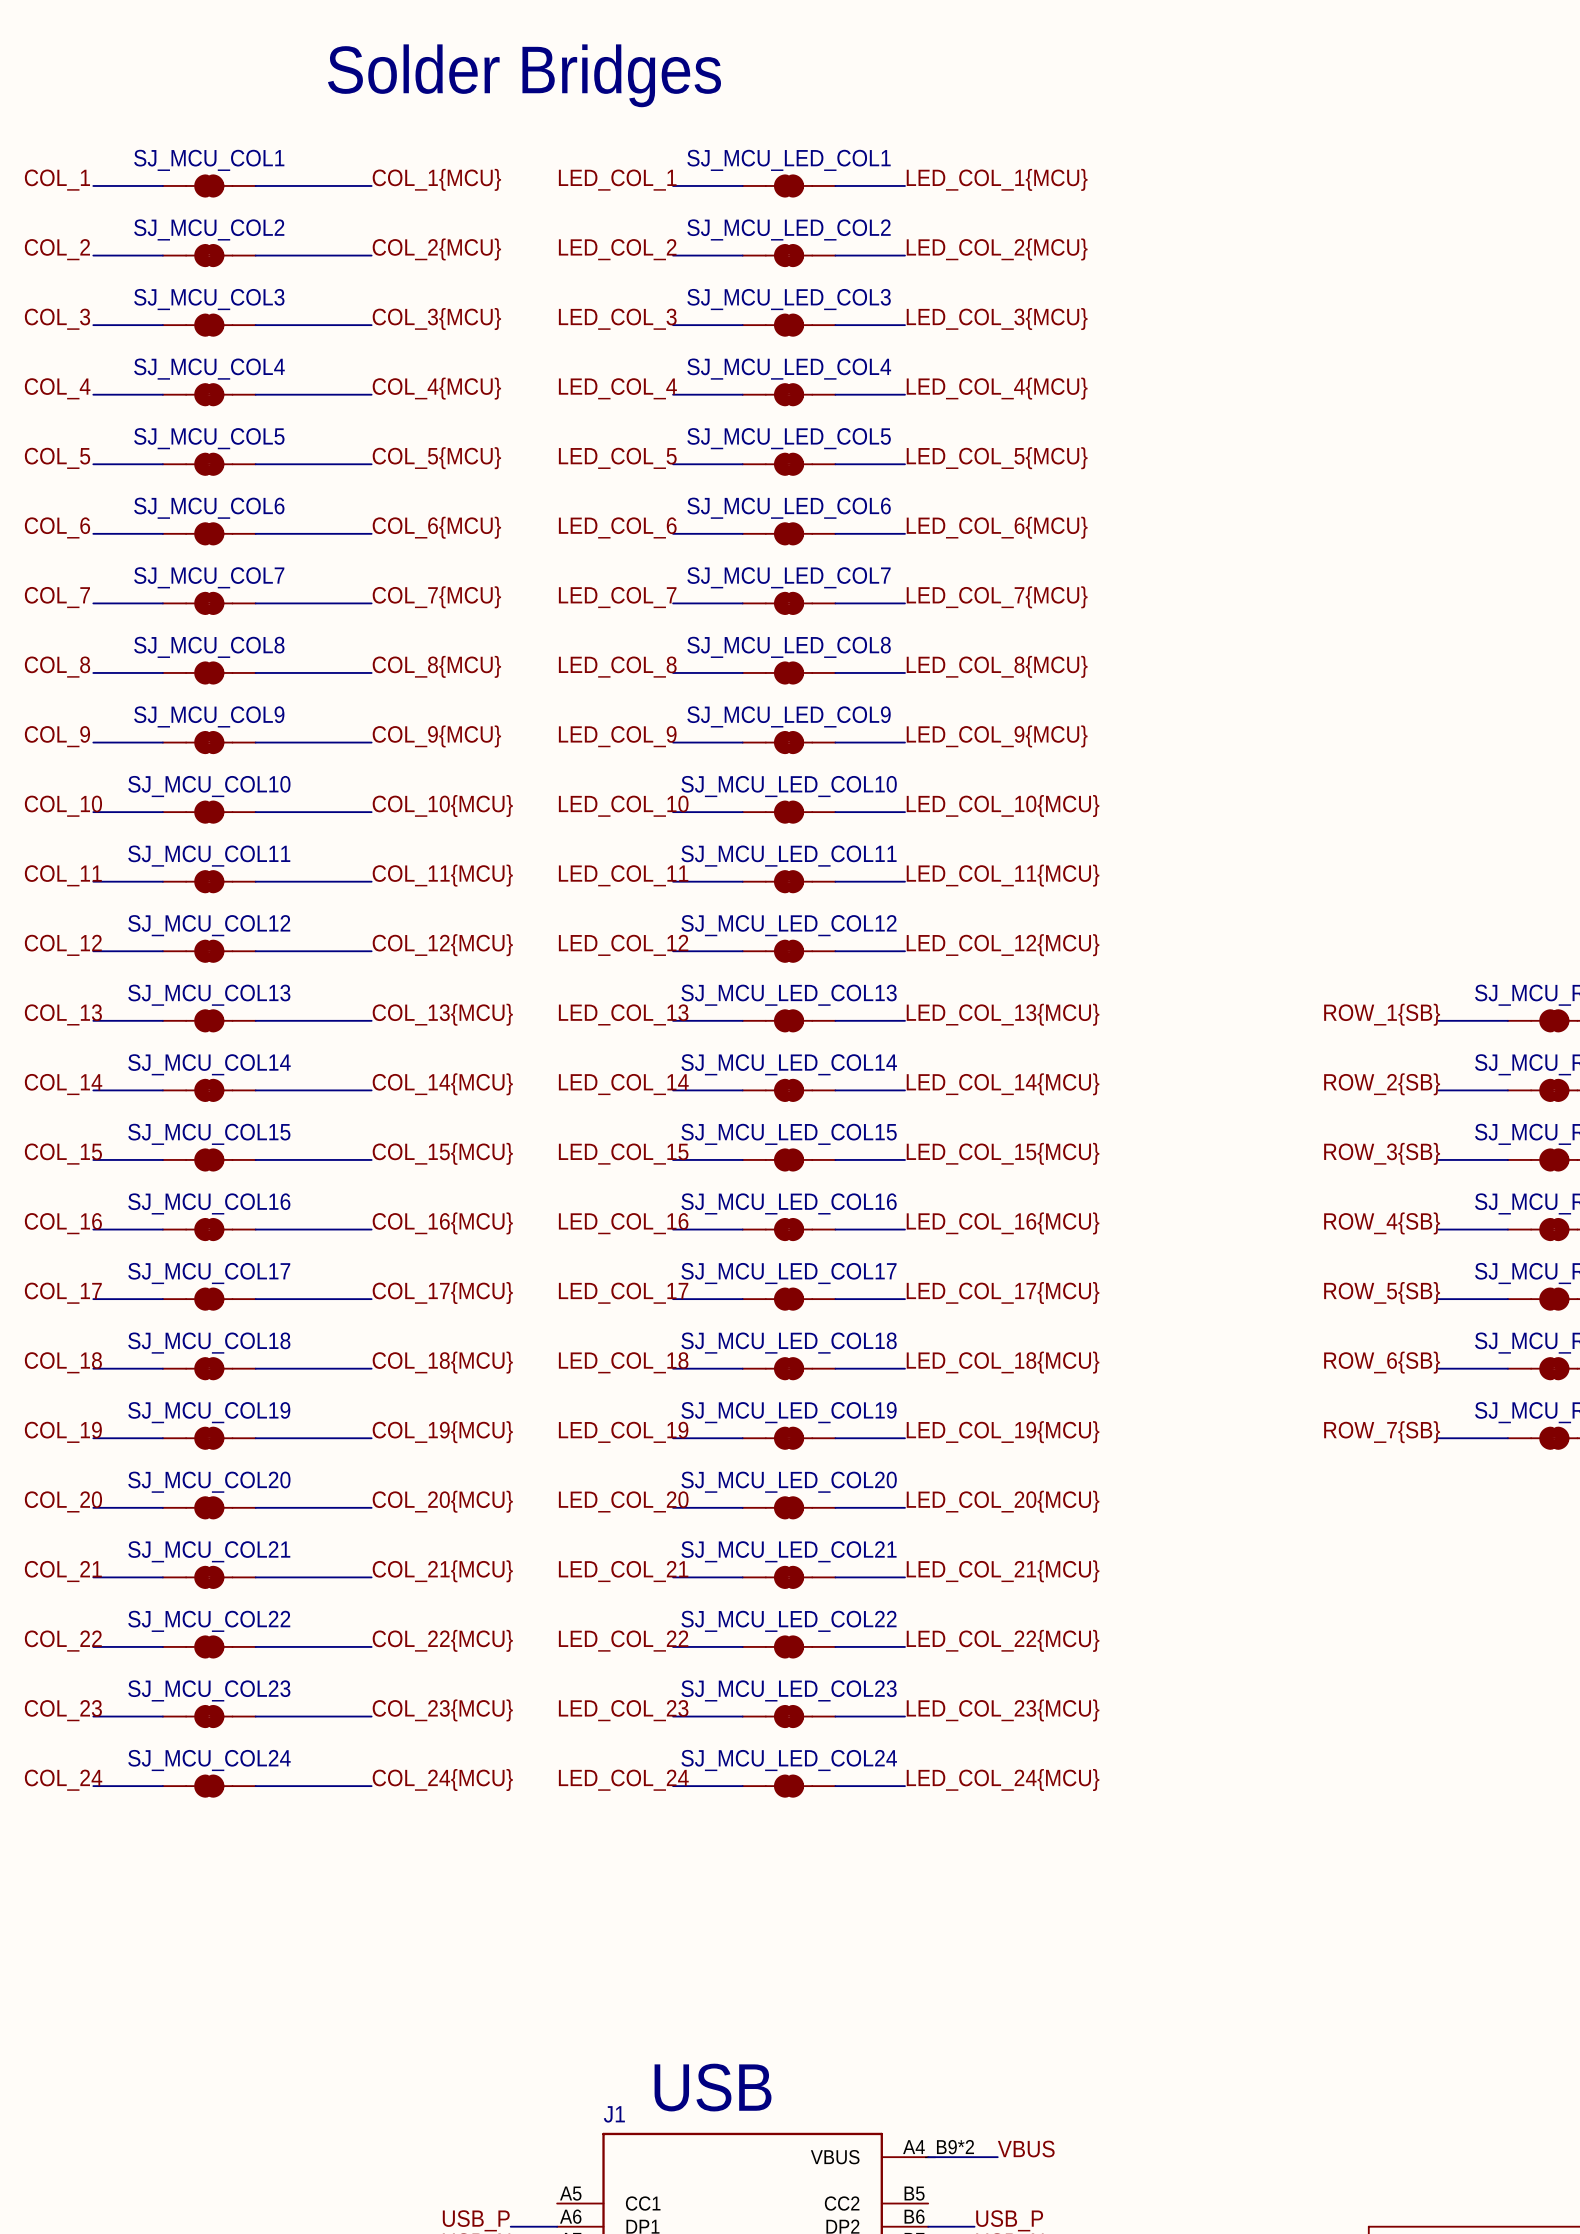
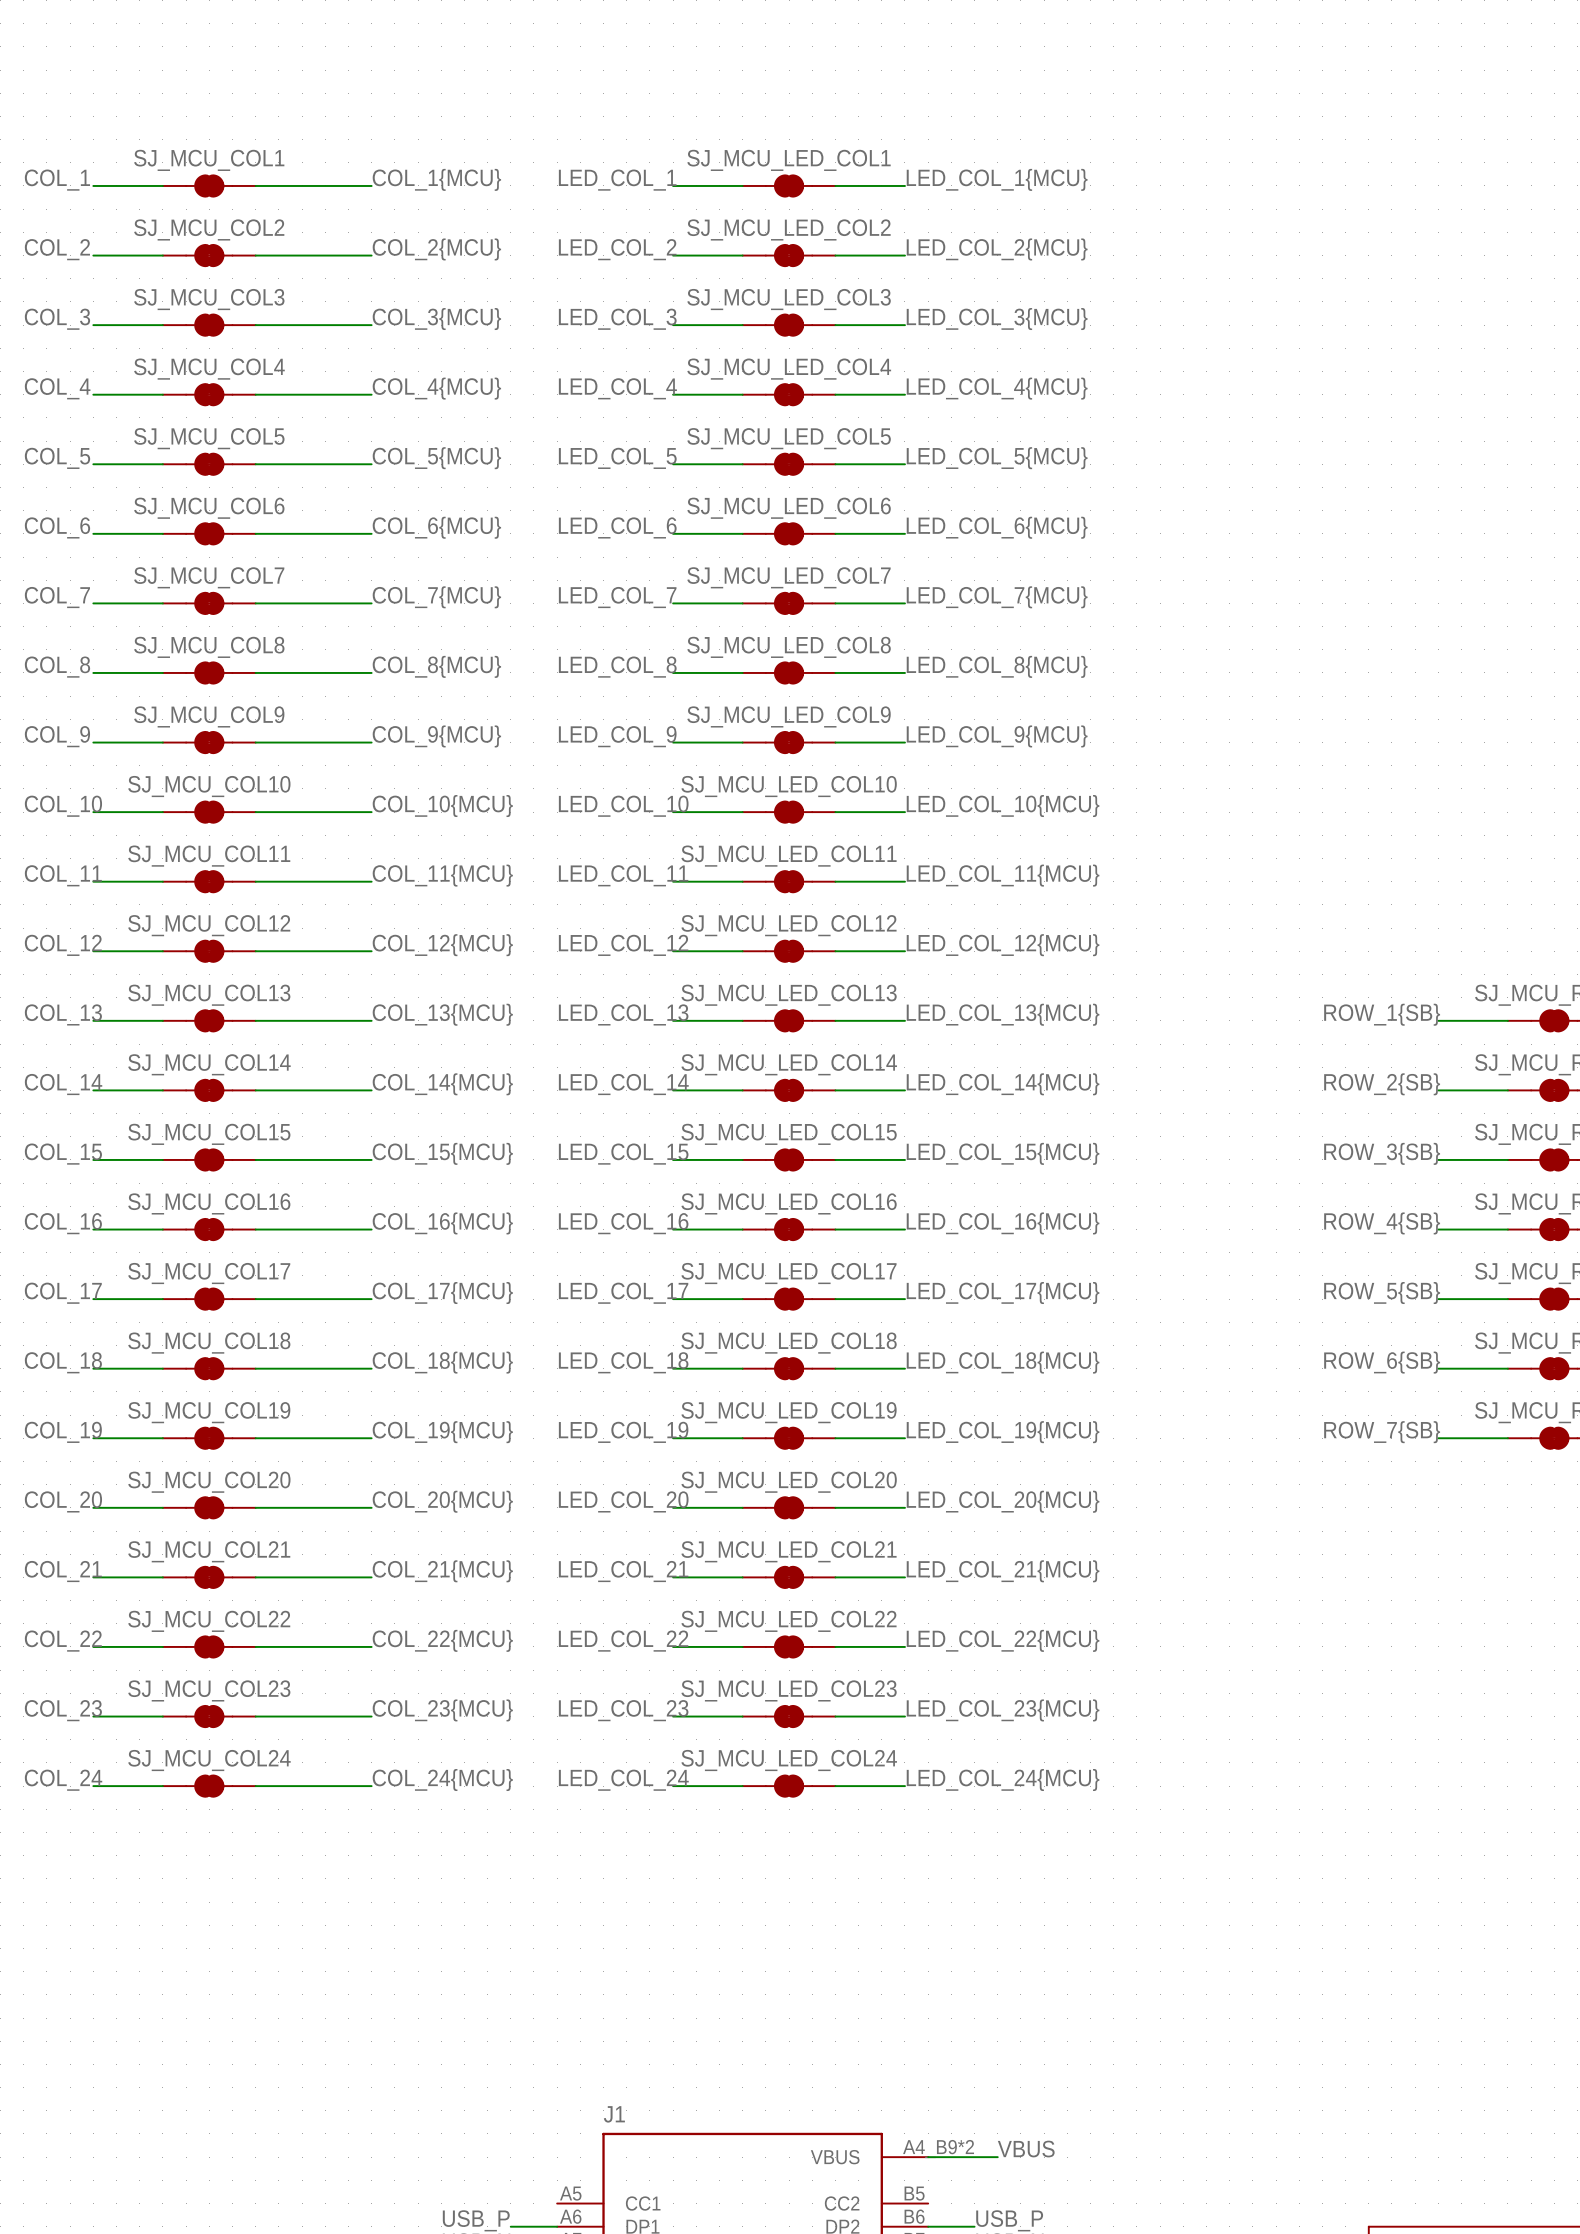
text: Solder Bridges (524, 75) -> none
text: USB (713, 2087) -> none

